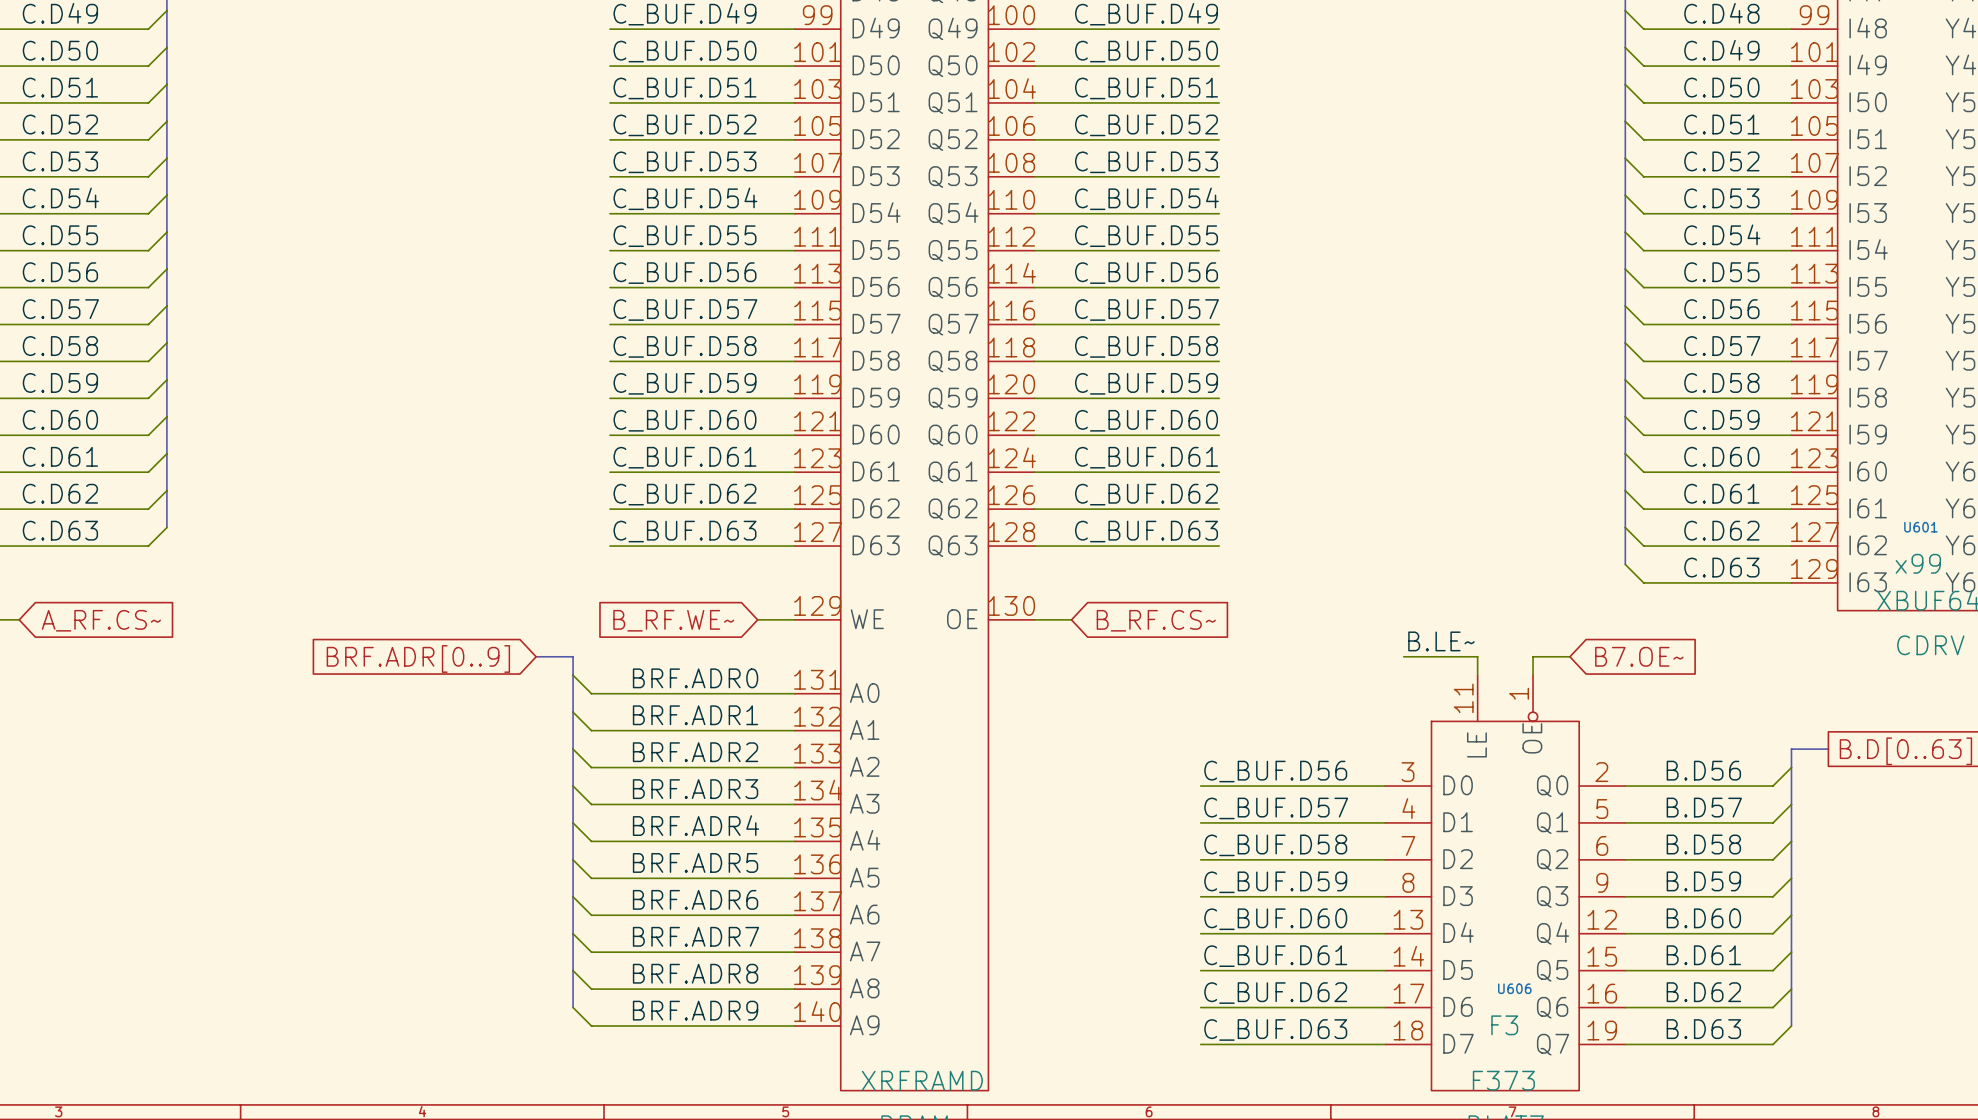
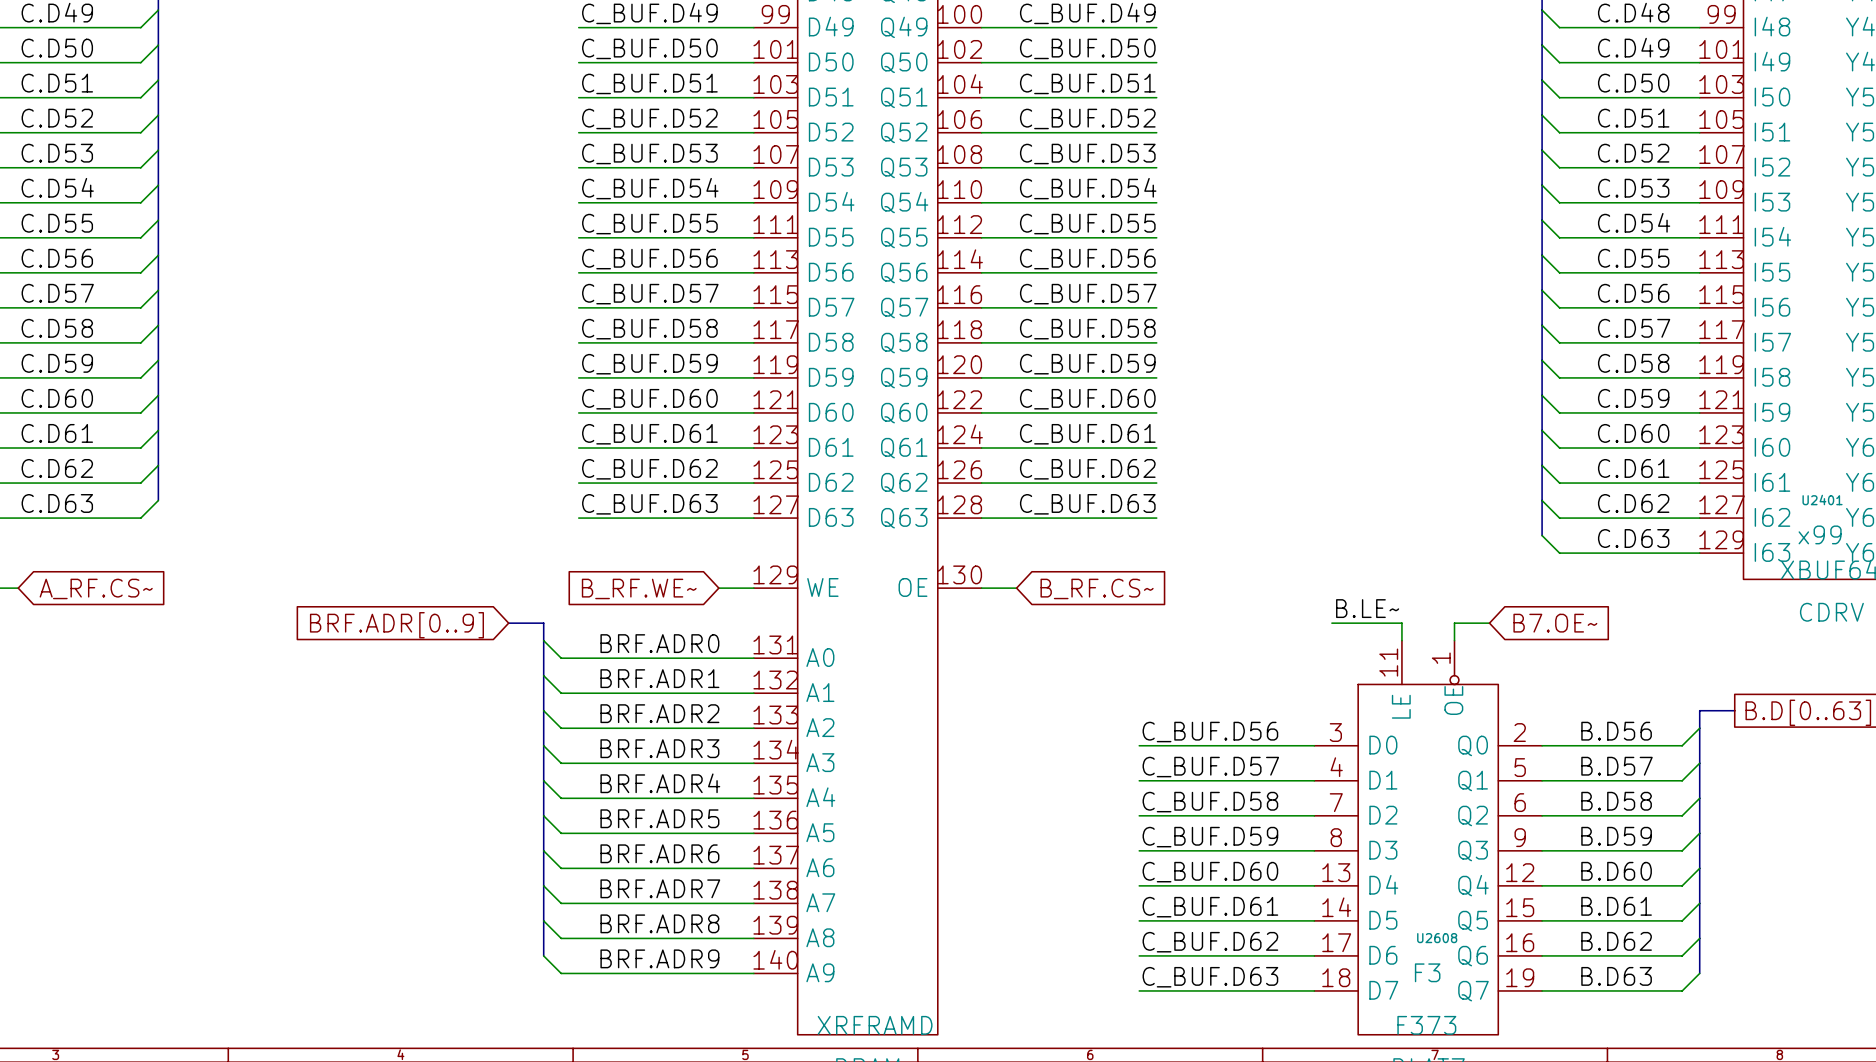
U601 name: U601 (1920, 527) -> U2401 (1822, 500)
U606 name: U606 (1514, 988) -> U2608 (1437, 938)

